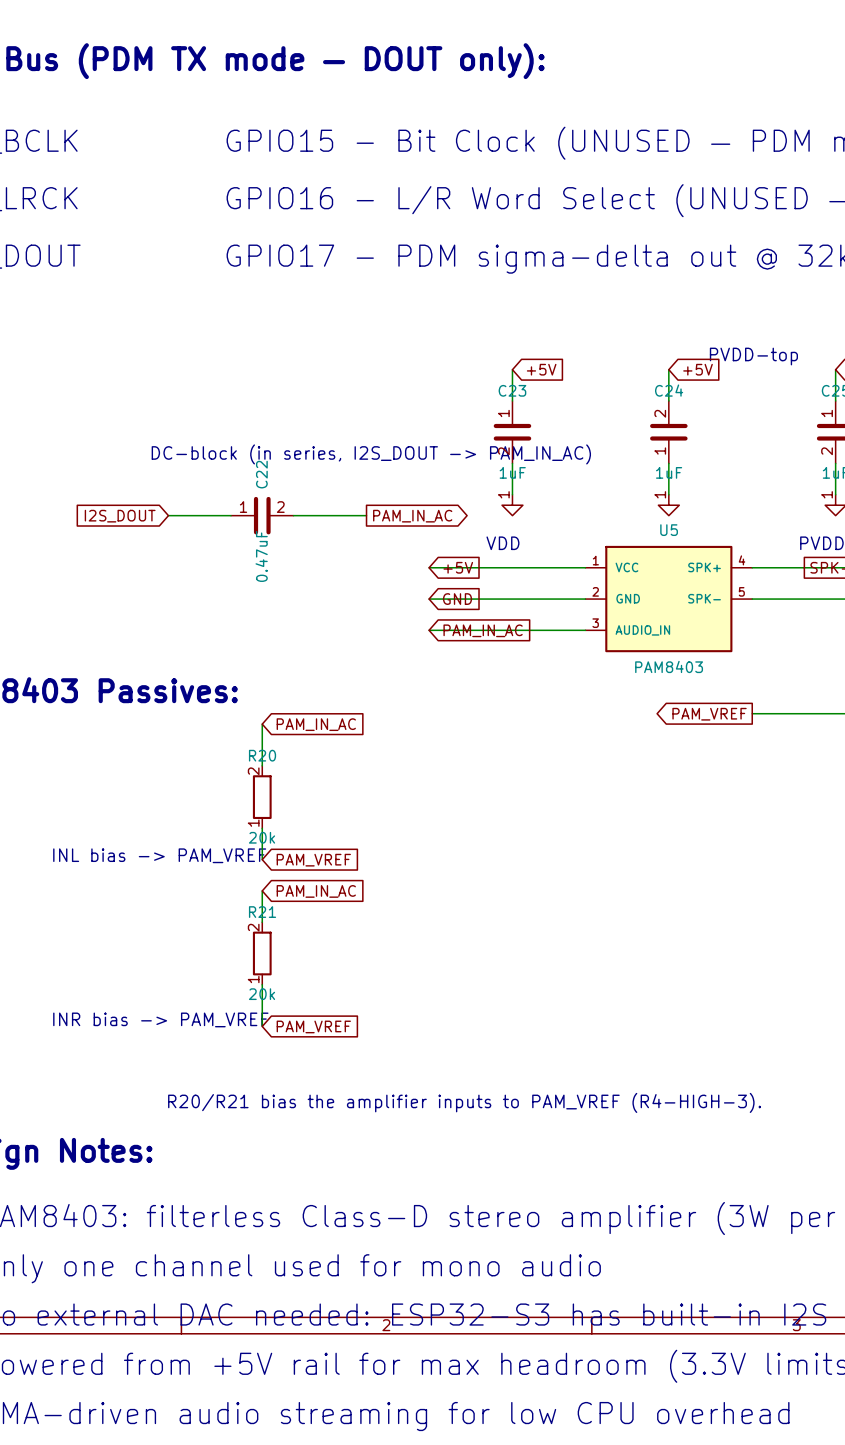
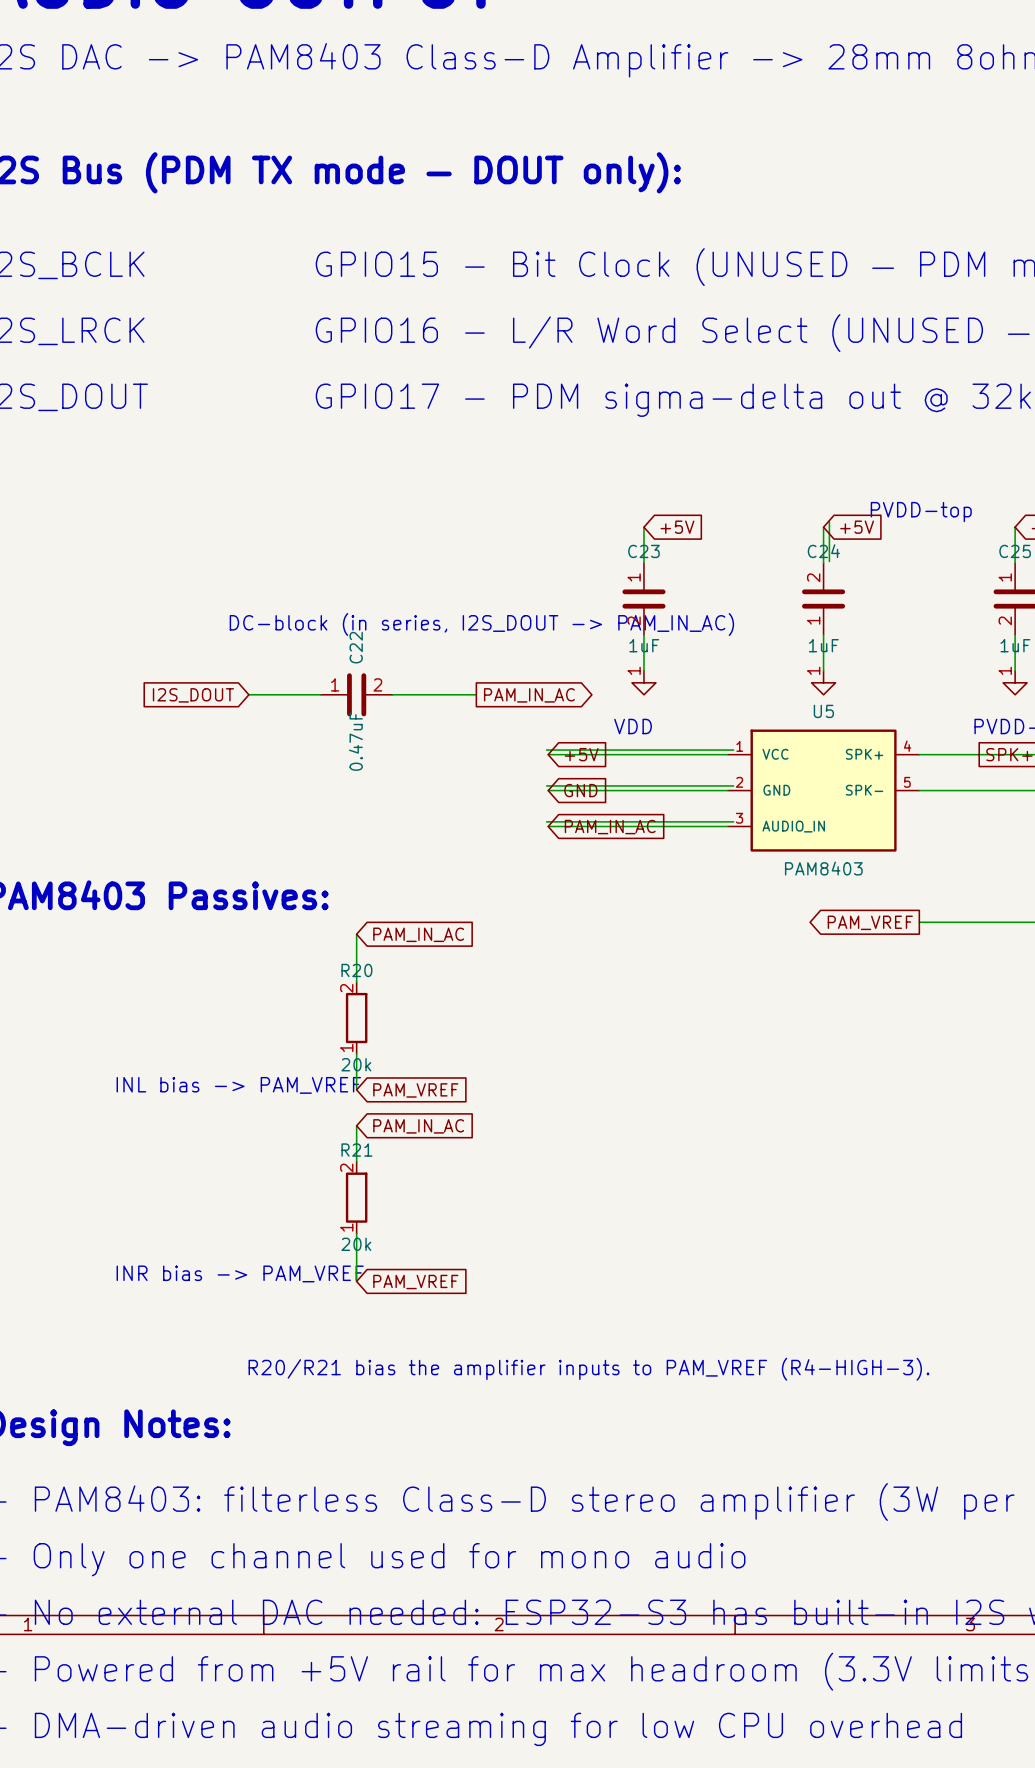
wire: none -> (829, 522) (829, 561)
wire: none -> (546, 750) (733, 750)
wire: none -> (546, 785) (733, 785)
wire: none -> (546, 821) (733, 821)

